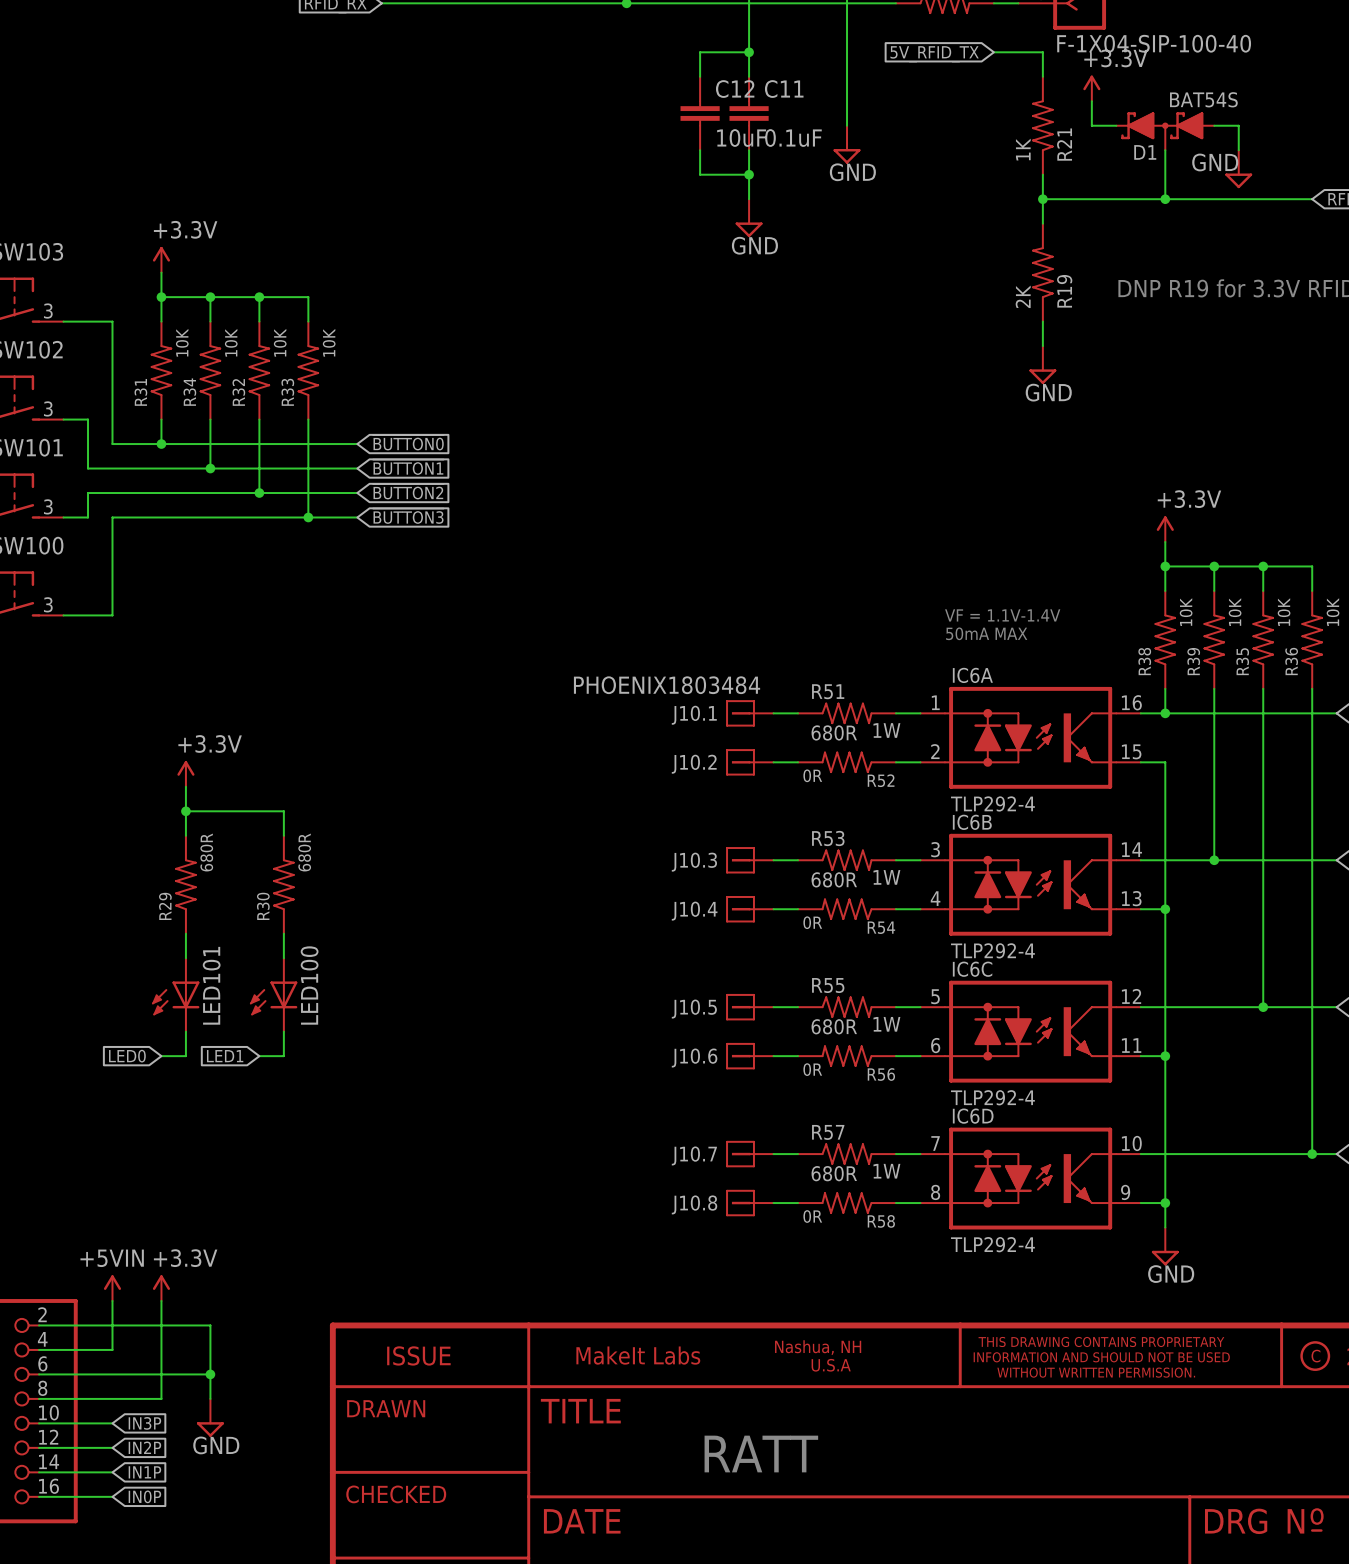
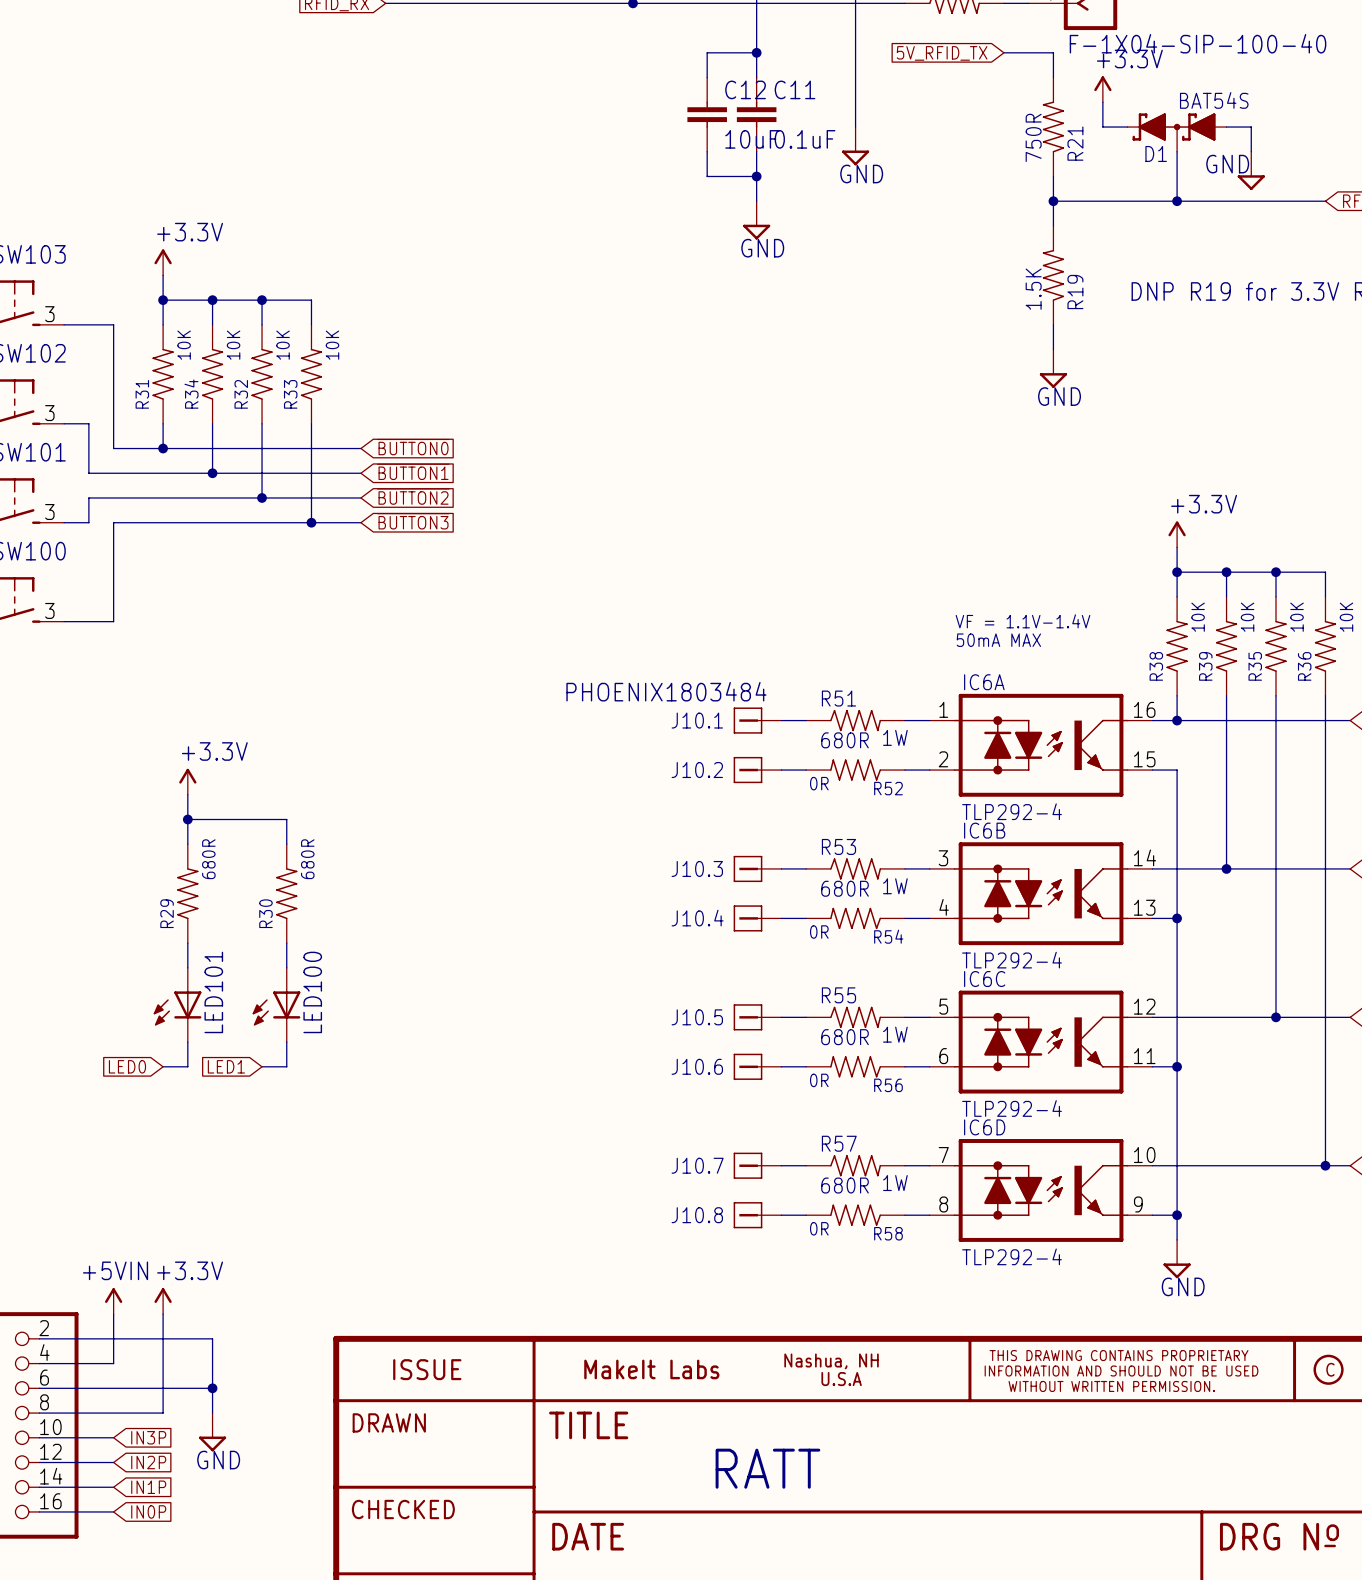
R21 value: 1K (1023, 149) -> 750R (1033, 137)
R19 value: 2K (1023, 296) -> 1.5K (1033, 289)

